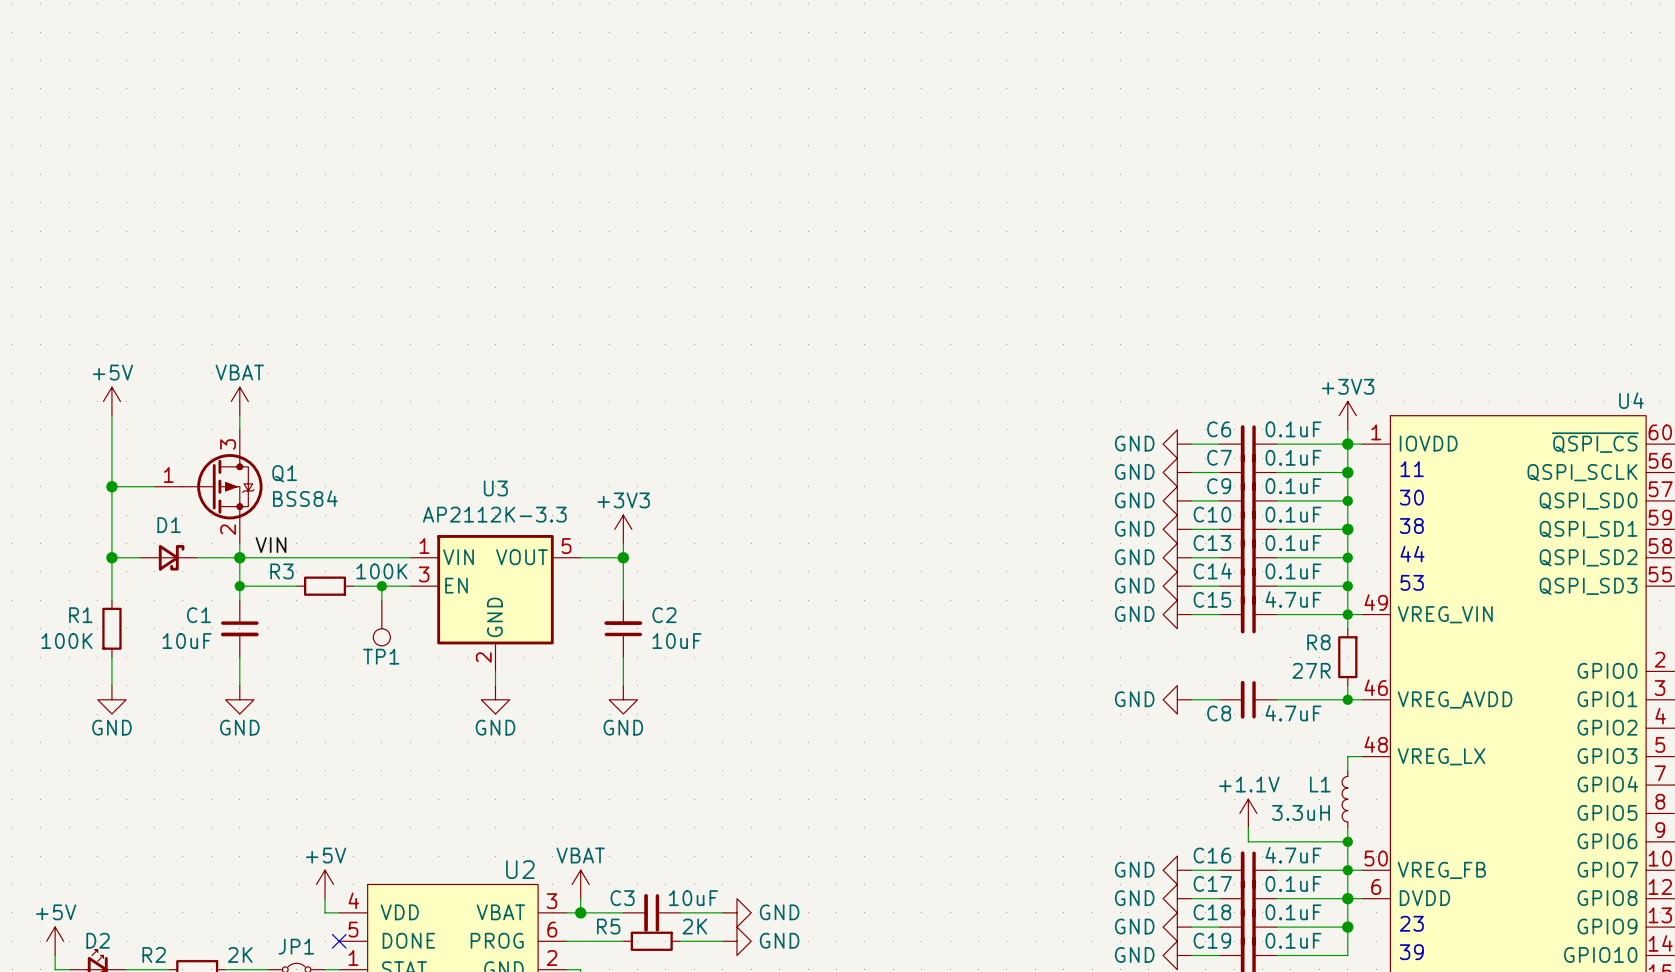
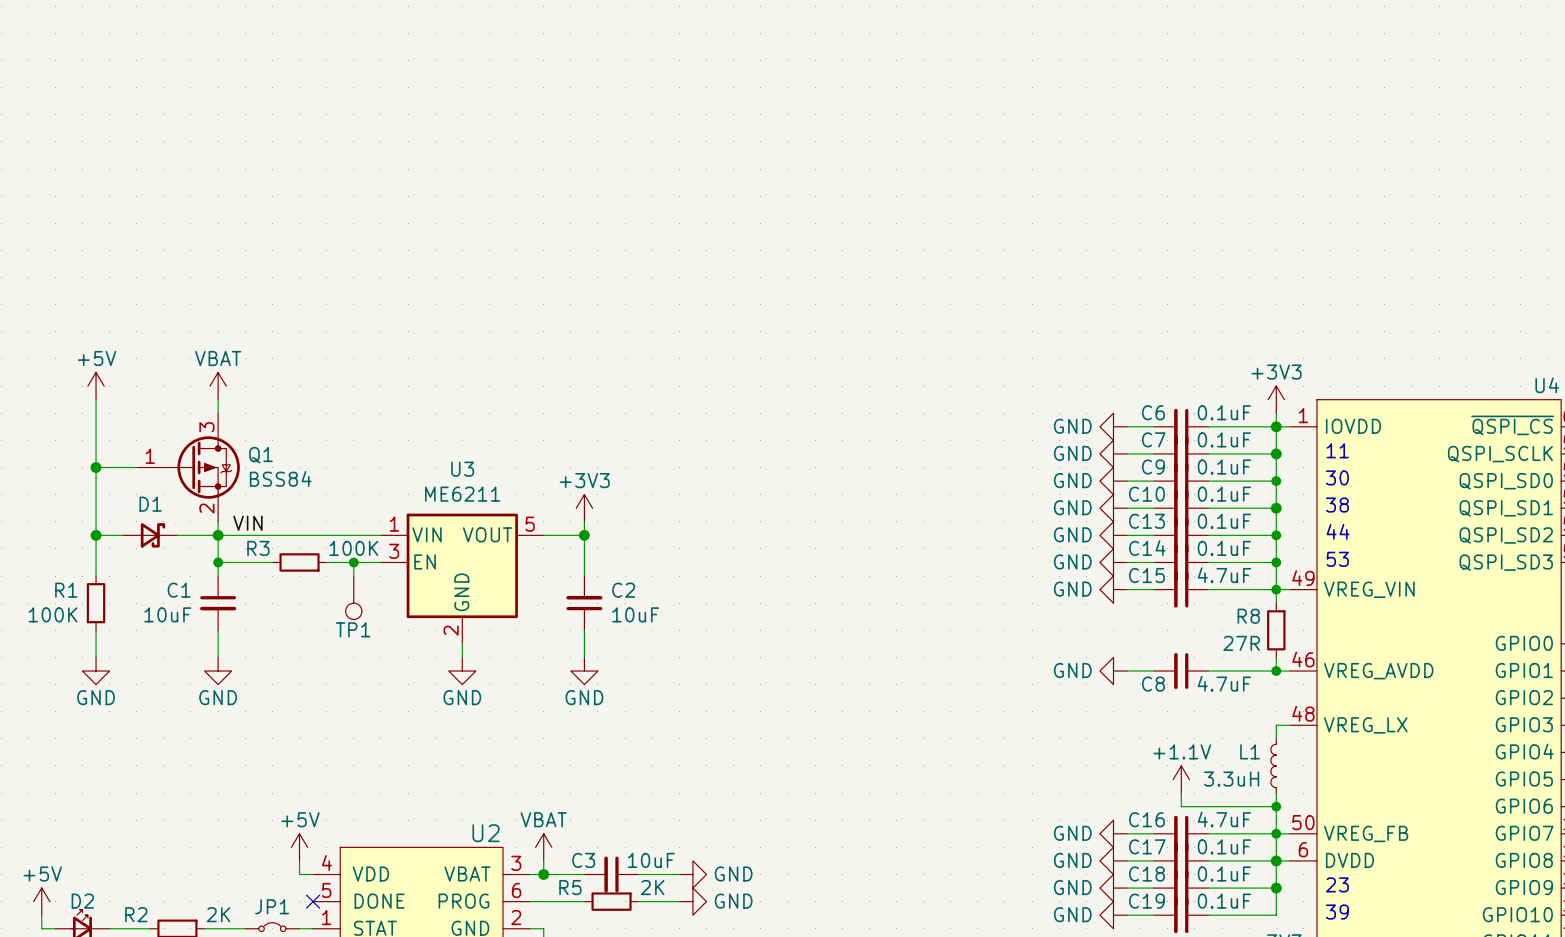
U3 value: AP2112K-3.3 (494, 514) -> ME6211 (462, 494)

